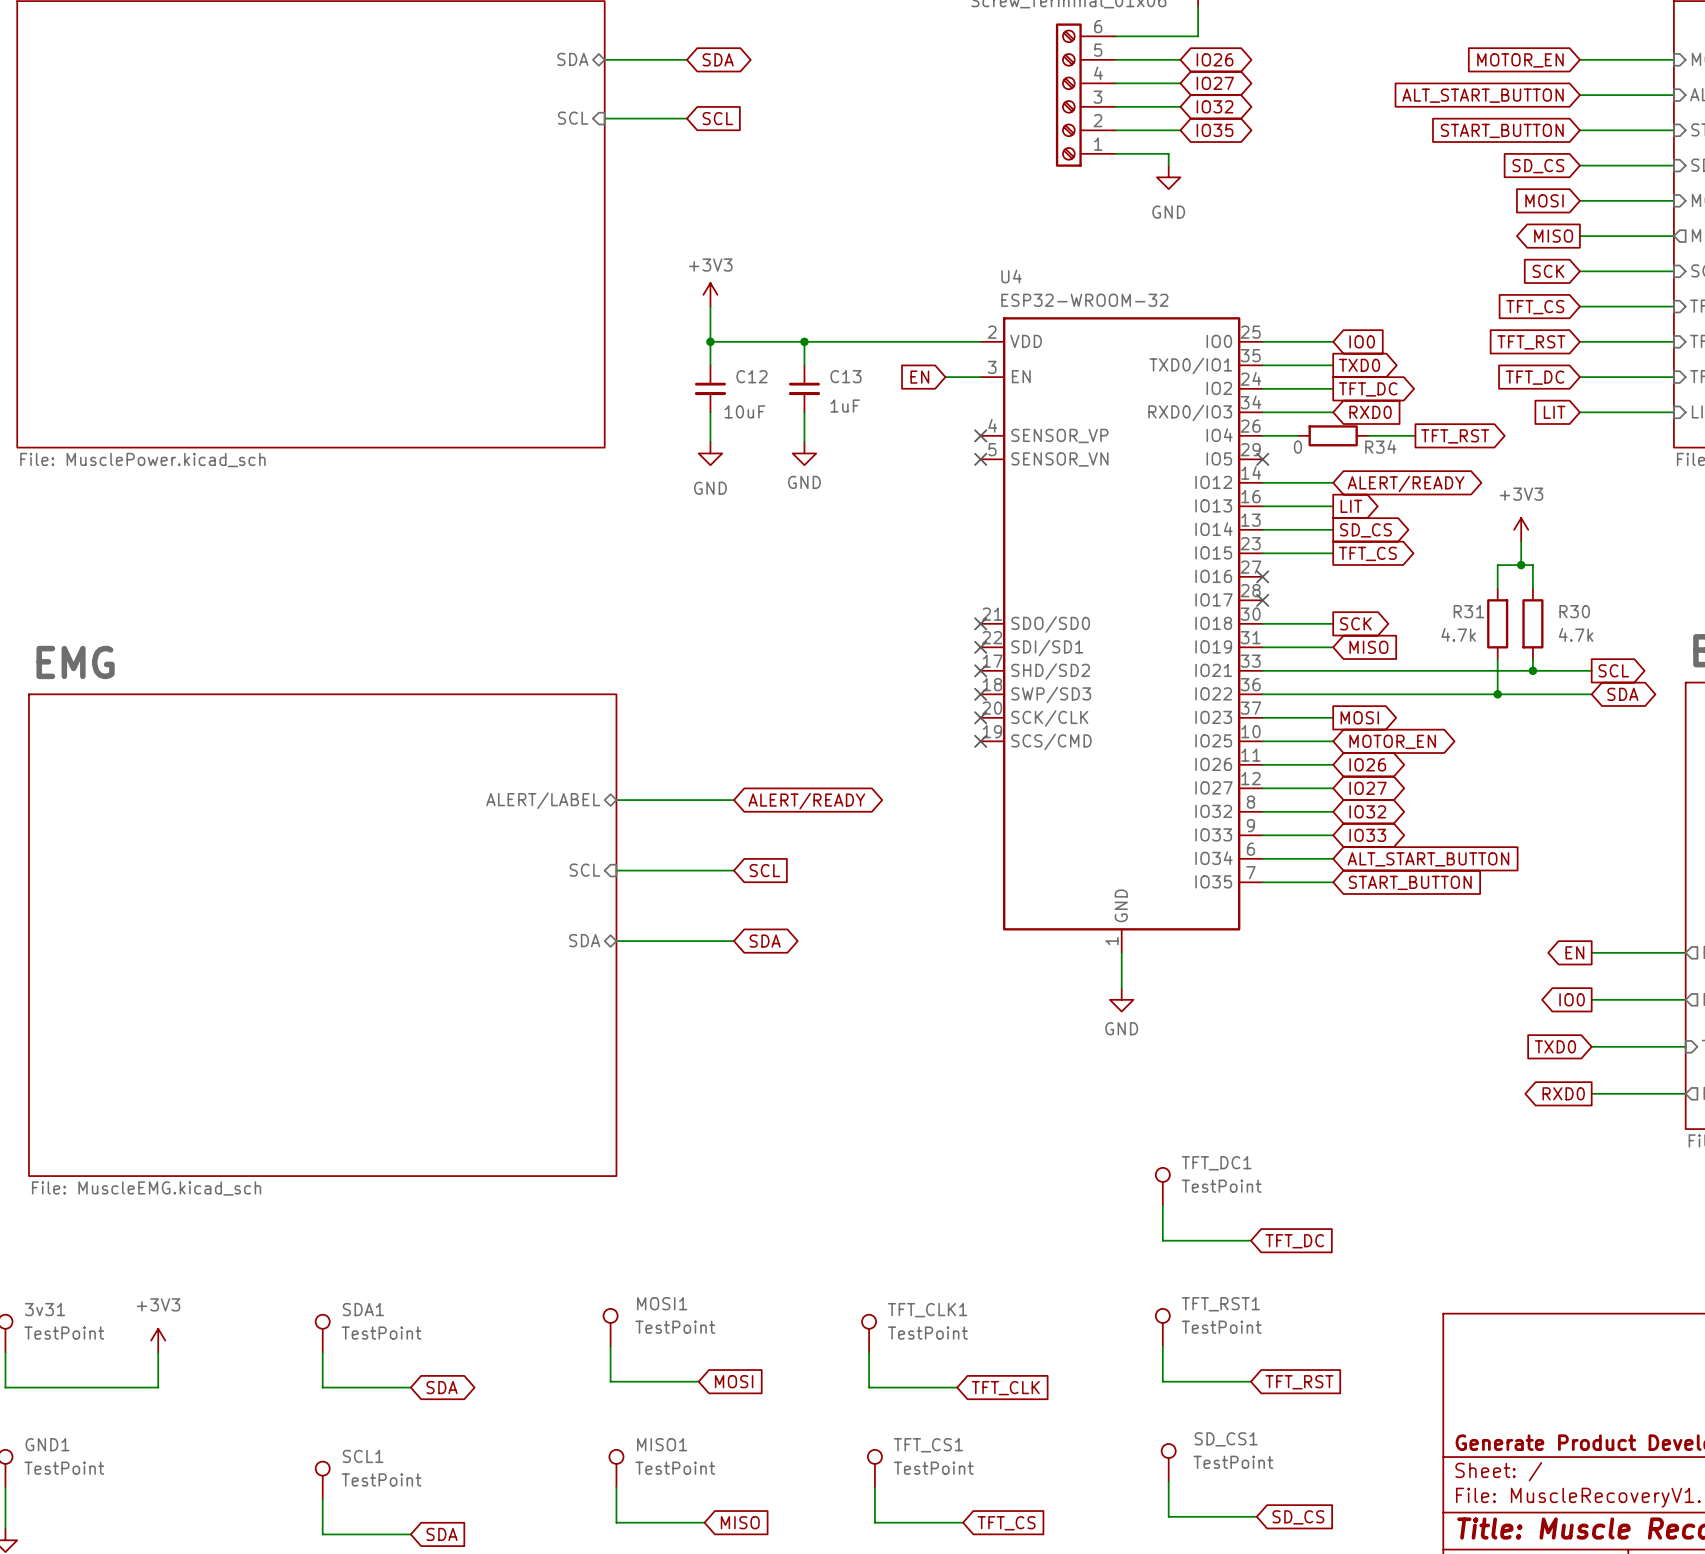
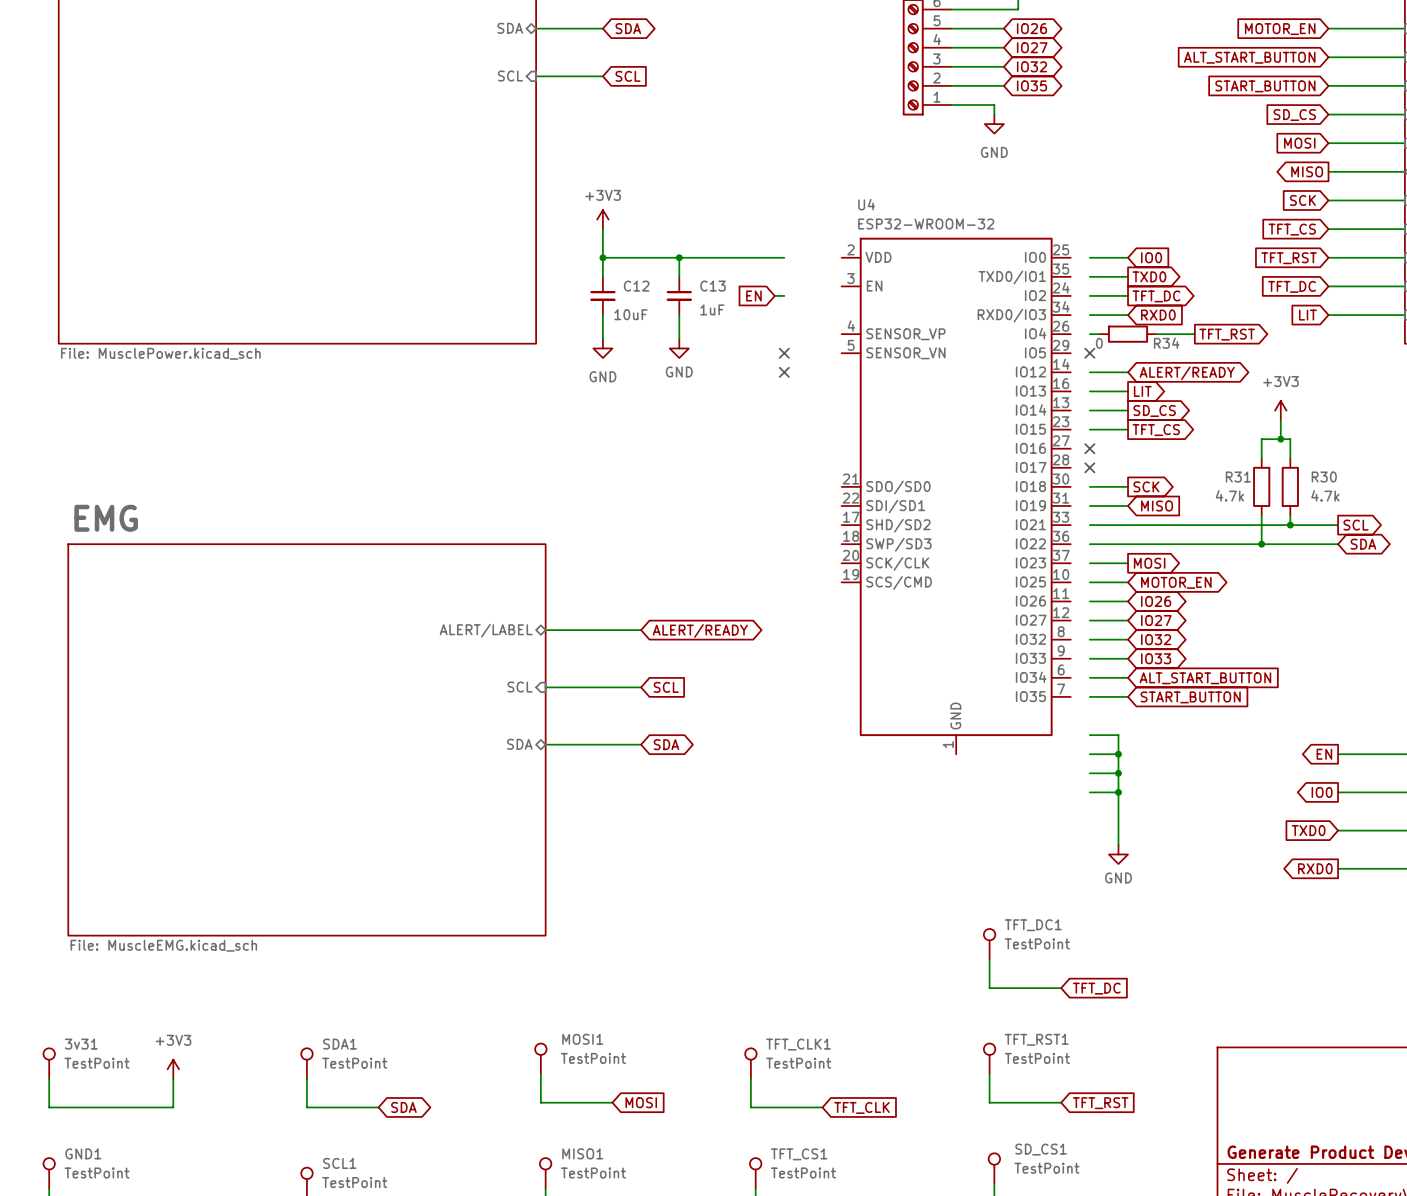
power symbol position: +3V3 (710, 294) -> +3V3 (602, 219)
wire: (710, 306) (710, 365) -> (602, 229) (602, 276)
wire: none -> (602, 257) (622, 257)
junction position: (710, 341) -> (602, 257)
wire: (804, 341) (804, 365) -> (679, 257) (679, 276)
junction position: (804, 341) -> (679, 257)
wire: (910, 341) (980, 341) -> none
wire: (1262, 341) (1286, 341) -> none
wire: (1262, 365) (1286, 365) -> none
global label position: EN (919, 377) -> EN (753, 295)
wire: (945, 377) (980, 377) -> none
C12 position: (710, 388) -> (602, 295)
C13 position: (804, 388) -> (679, 295)
wire: (1262, 388) (1286, 388) -> none
wire: (710, 412) (710, 441) -> (602, 315) (602, 338)
wire: (804, 412) (804, 441) -> (679, 315) (679, 338)
wire: (1262, 412) (1286, 412) -> none
no-connect mark: (980, 435) -> none
wire: (1262, 435) (1286, 435) -> none
power symbol position: GND (710, 453) -> GND (602, 348)
power symbol position: GND (804, 453) -> GND (679, 348)
no-connect mark: none -> (784, 353)
no-connect mark: (980, 459) -> none
no-connect mark position: (1262, 459) -> (1089, 353)
no-connect mark: none -> (784, 372)
wire: (1262, 482) (1286, 482) -> none
wire: (1262, 506) (1286, 506) -> none
wire: (1262, 529) (1286, 529) -> none
wire: (1262, 553) (1286, 553) -> none
no-connect mark: (1262, 576) -> none
no-connect mark: none -> (1089, 448)
no-connect mark: (1262, 600) -> none
no-connect mark: none -> (1089, 467)
no-connect mark: (980, 623) -> none
wire: (1262, 623) (1286, 623) -> none
no-connect mark: (980, 647) -> none
wire: (1262, 647) (1286, 647) -> none
no-connect mark: (980, 670) -> none
wire: (1262, 670) (1286, 670) -> none
no-connect mark: (980, 694) -> none
wire: (1262, 694) (1286, 694) -> none
no-connect mark: (980, 717) -> none
wire: (1262, 717) (1286, 717) -> none
no-connect mark: (980, 741) -> none
wire: (1262, 741) (1286, 741) -> none
wire: (1262, 764) (1286, 764) -> none
wire: (1262, 788) (1286, 788) -> none
wire: (1262, 811) (1286, 811) -> none
wire: (1262, 835) (1286, 835) -> none
wire: (1262, 858) (1286, 858) -> none
wire: (1262, 882) (1286, 882) -> none
wire: none -> (1089, 735) (1118, 735) (1118, 844)
wire: (1121, 952) (1121, 988) -> none
wire: none -> (1089, 754) (1118, 754)
junction: none -> (1118, 754)
wire: none -> (1089, 773) (1118, 773)
junction: none -> (1118, 773)
power symbol position: GND (1121, 999) -> GND (1118, 854)
wire: none -> (1089, 792) (1118, 792)
junction: none -> (1118, 792)

